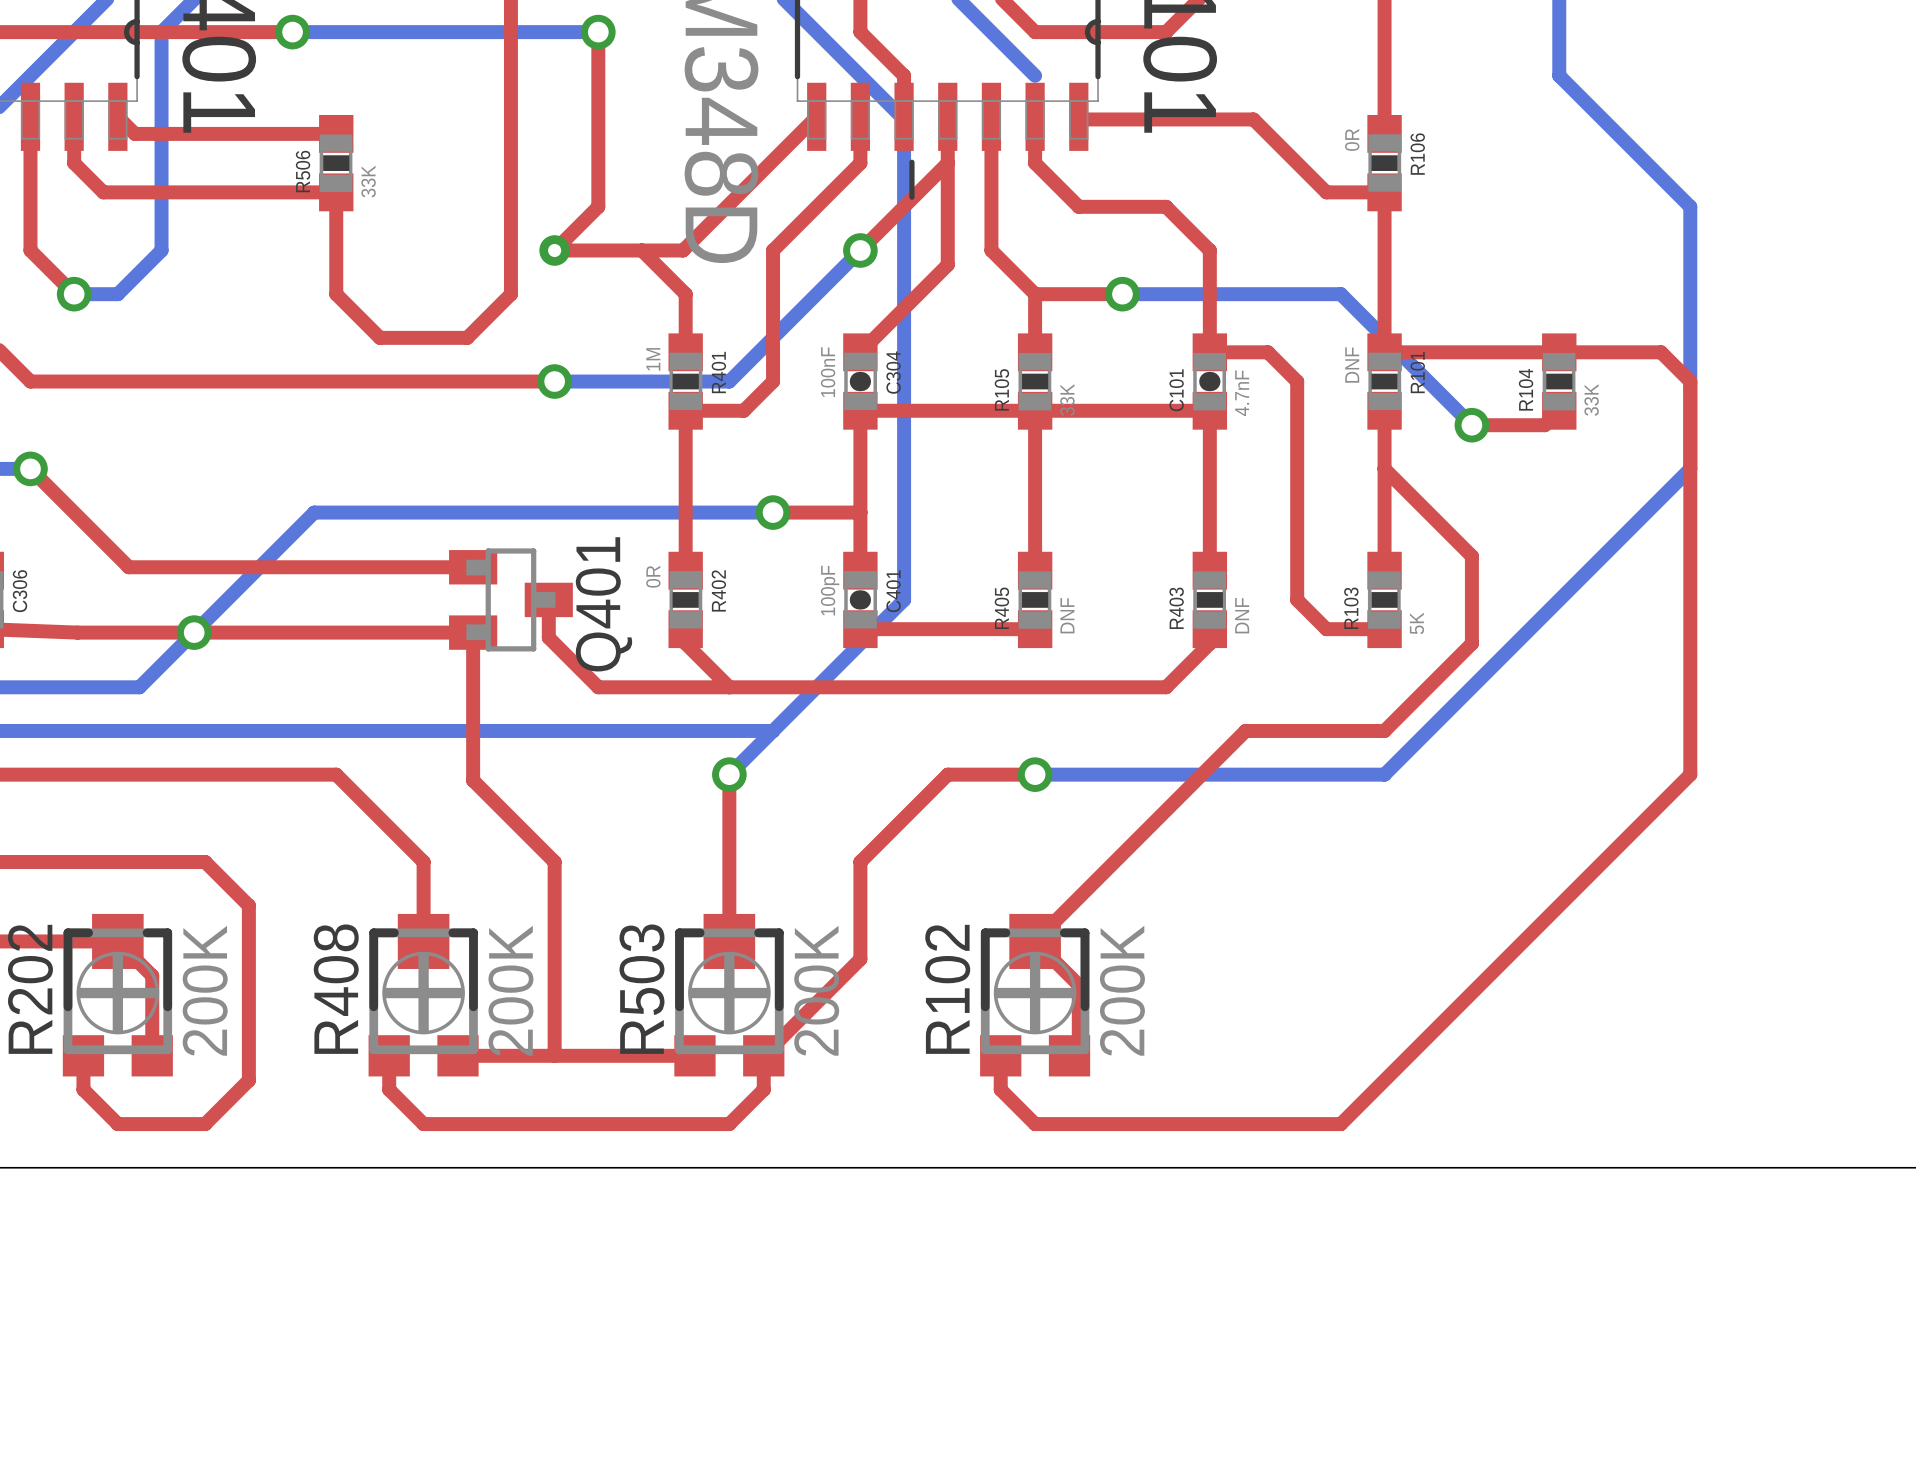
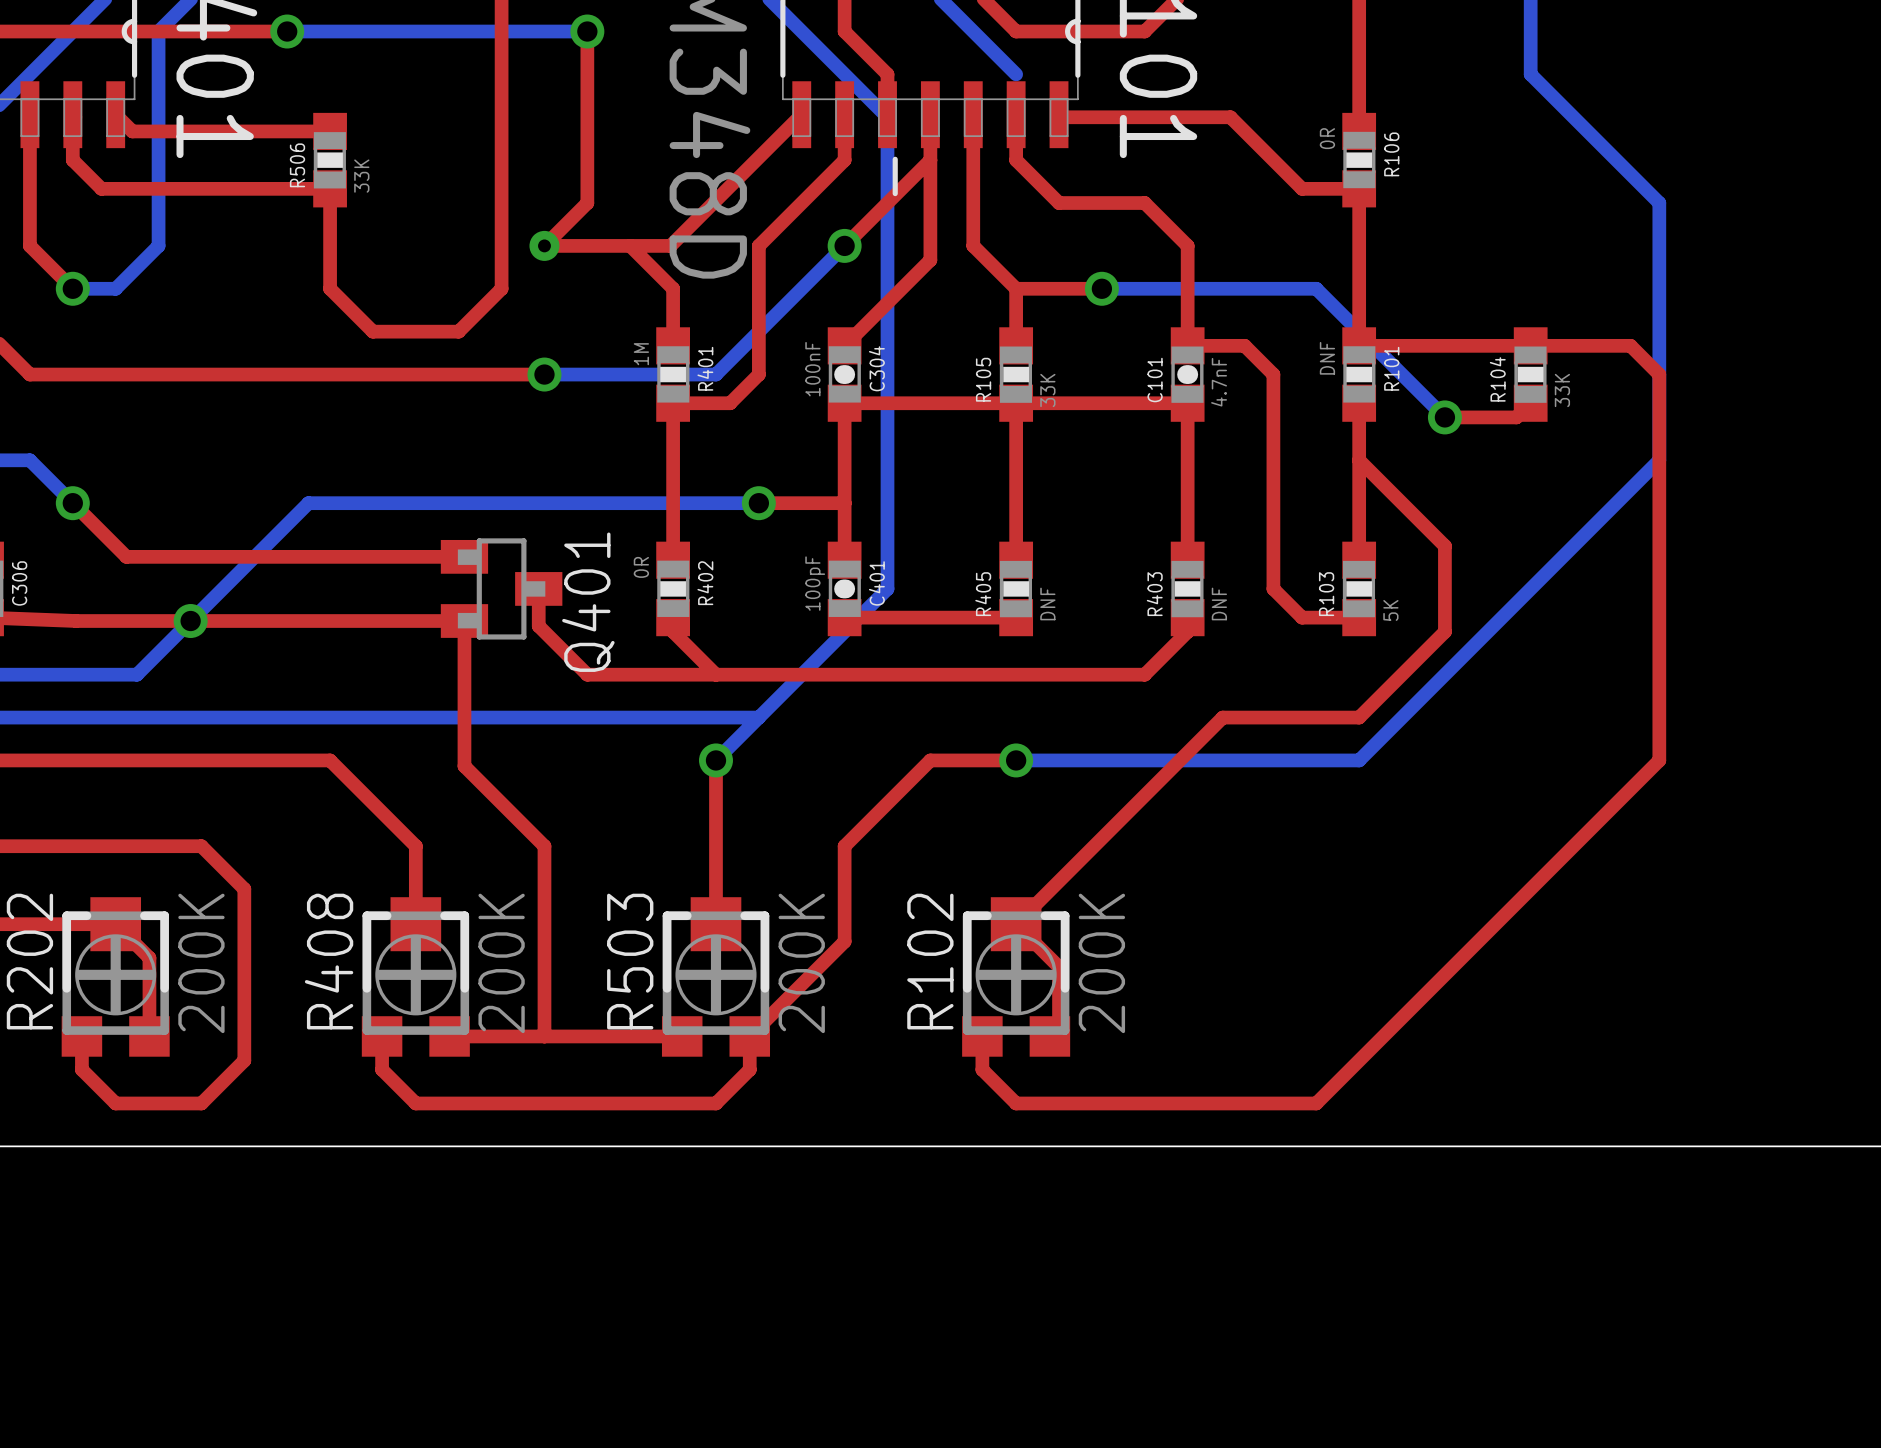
top track: (30, 468) (74, 512) -> none
bottom track: none -> (29, 460) (72, 503)
via position: (30, 468) -> (72, 503)

